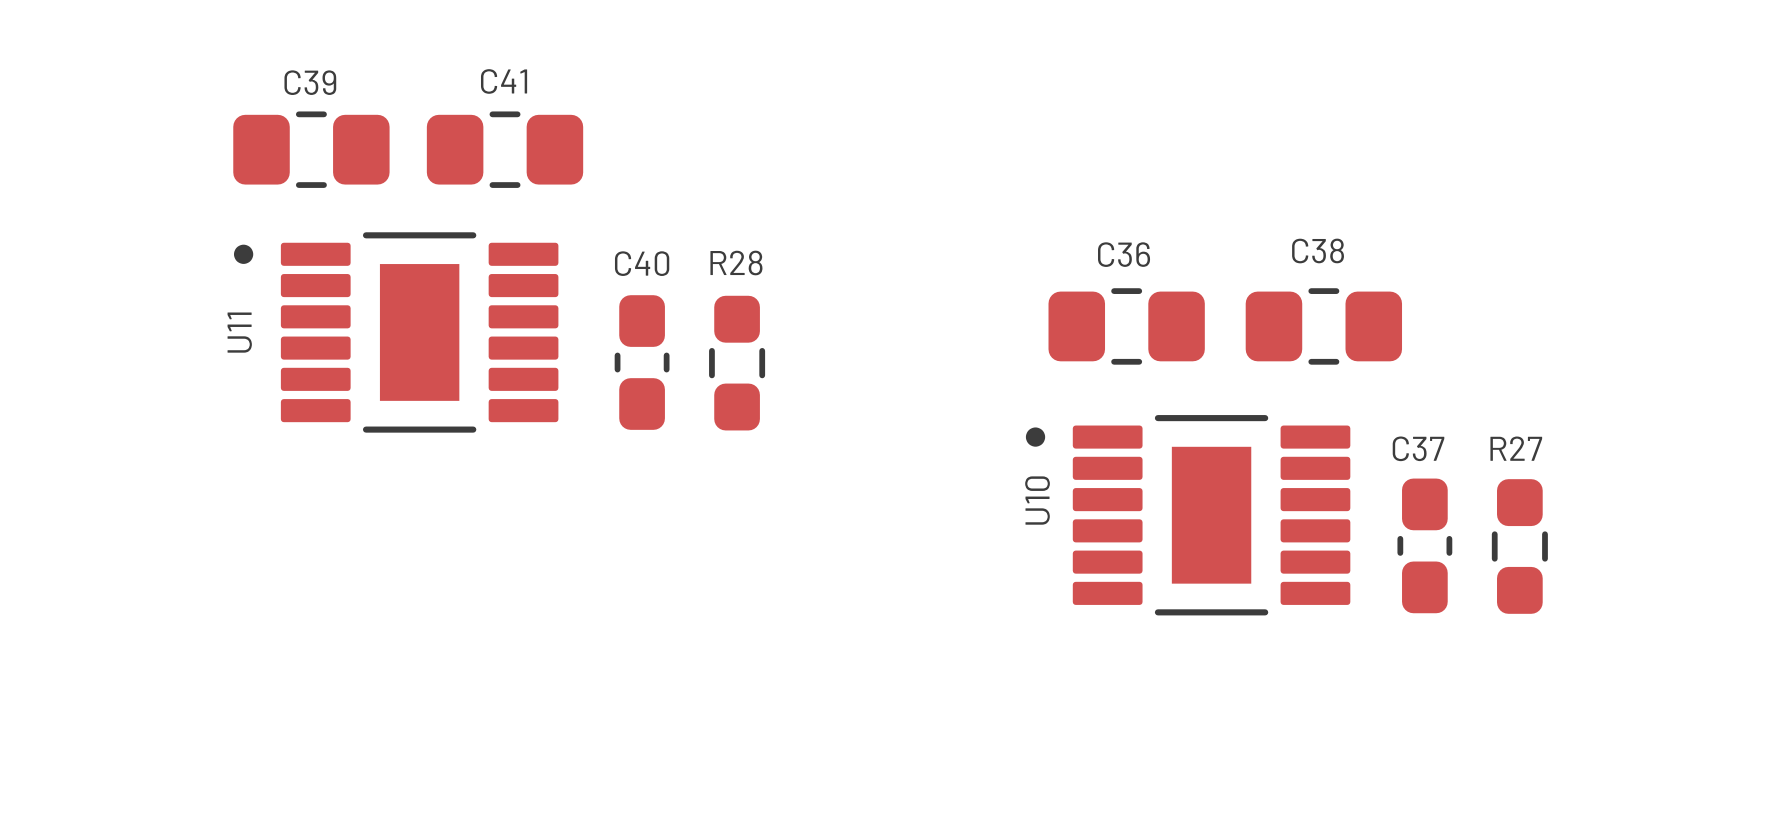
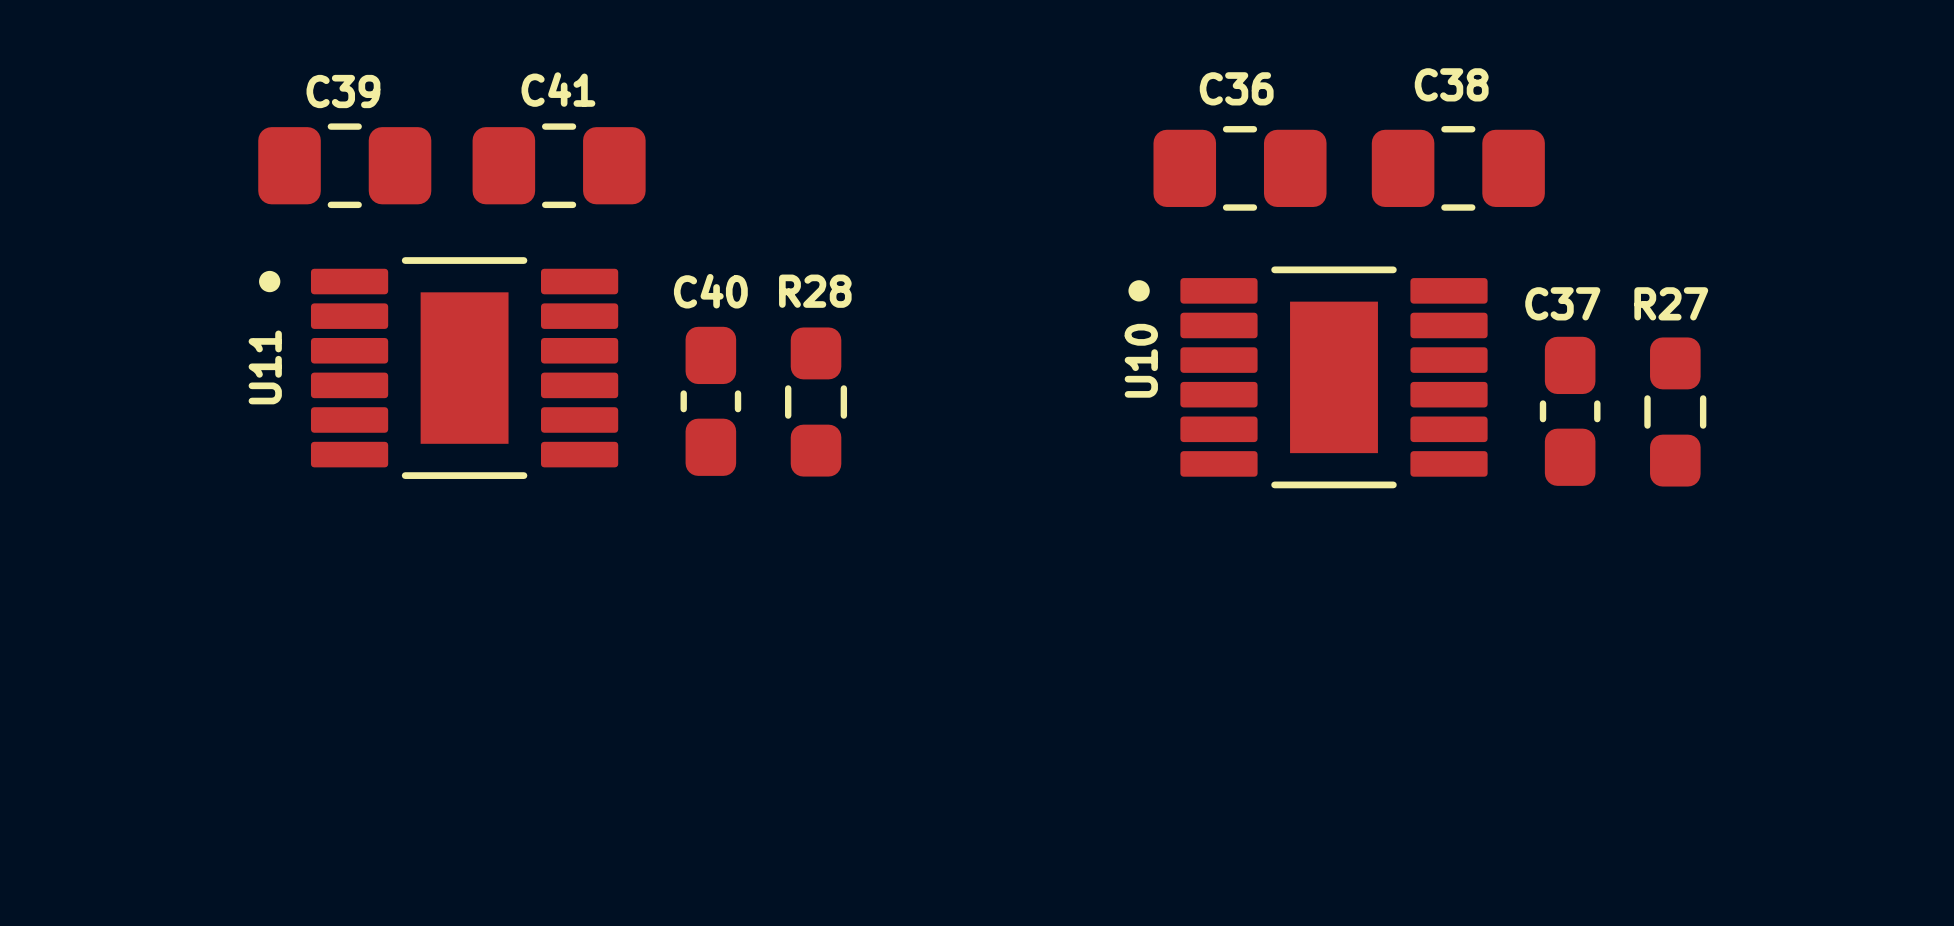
C36 position: (1126, 326) -> (1240, 168)
C38 position: (1323, 326) -> (1458, 168)
U10 position: (1188, 515) -> (1308, 377)
C37 position: (1424, 545) -> (1570, 411)
R27 position: (1519, 546) -> (1675, 411)

